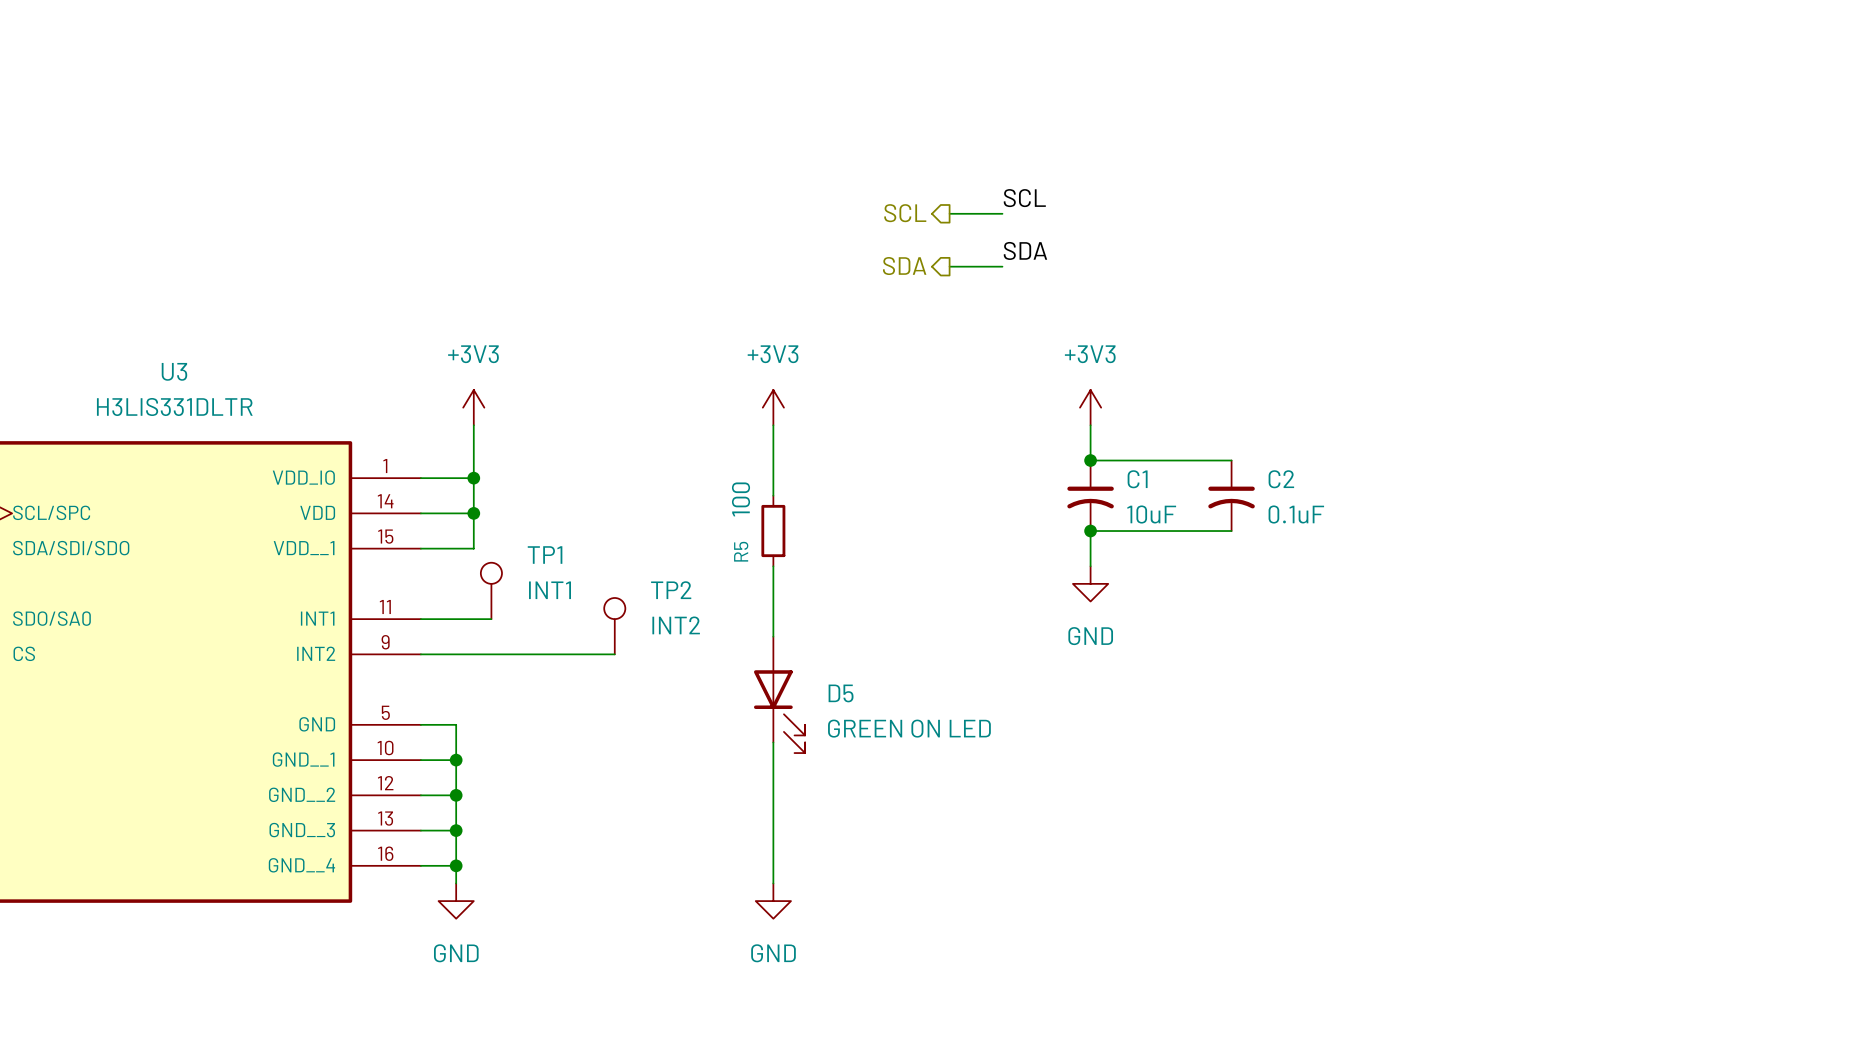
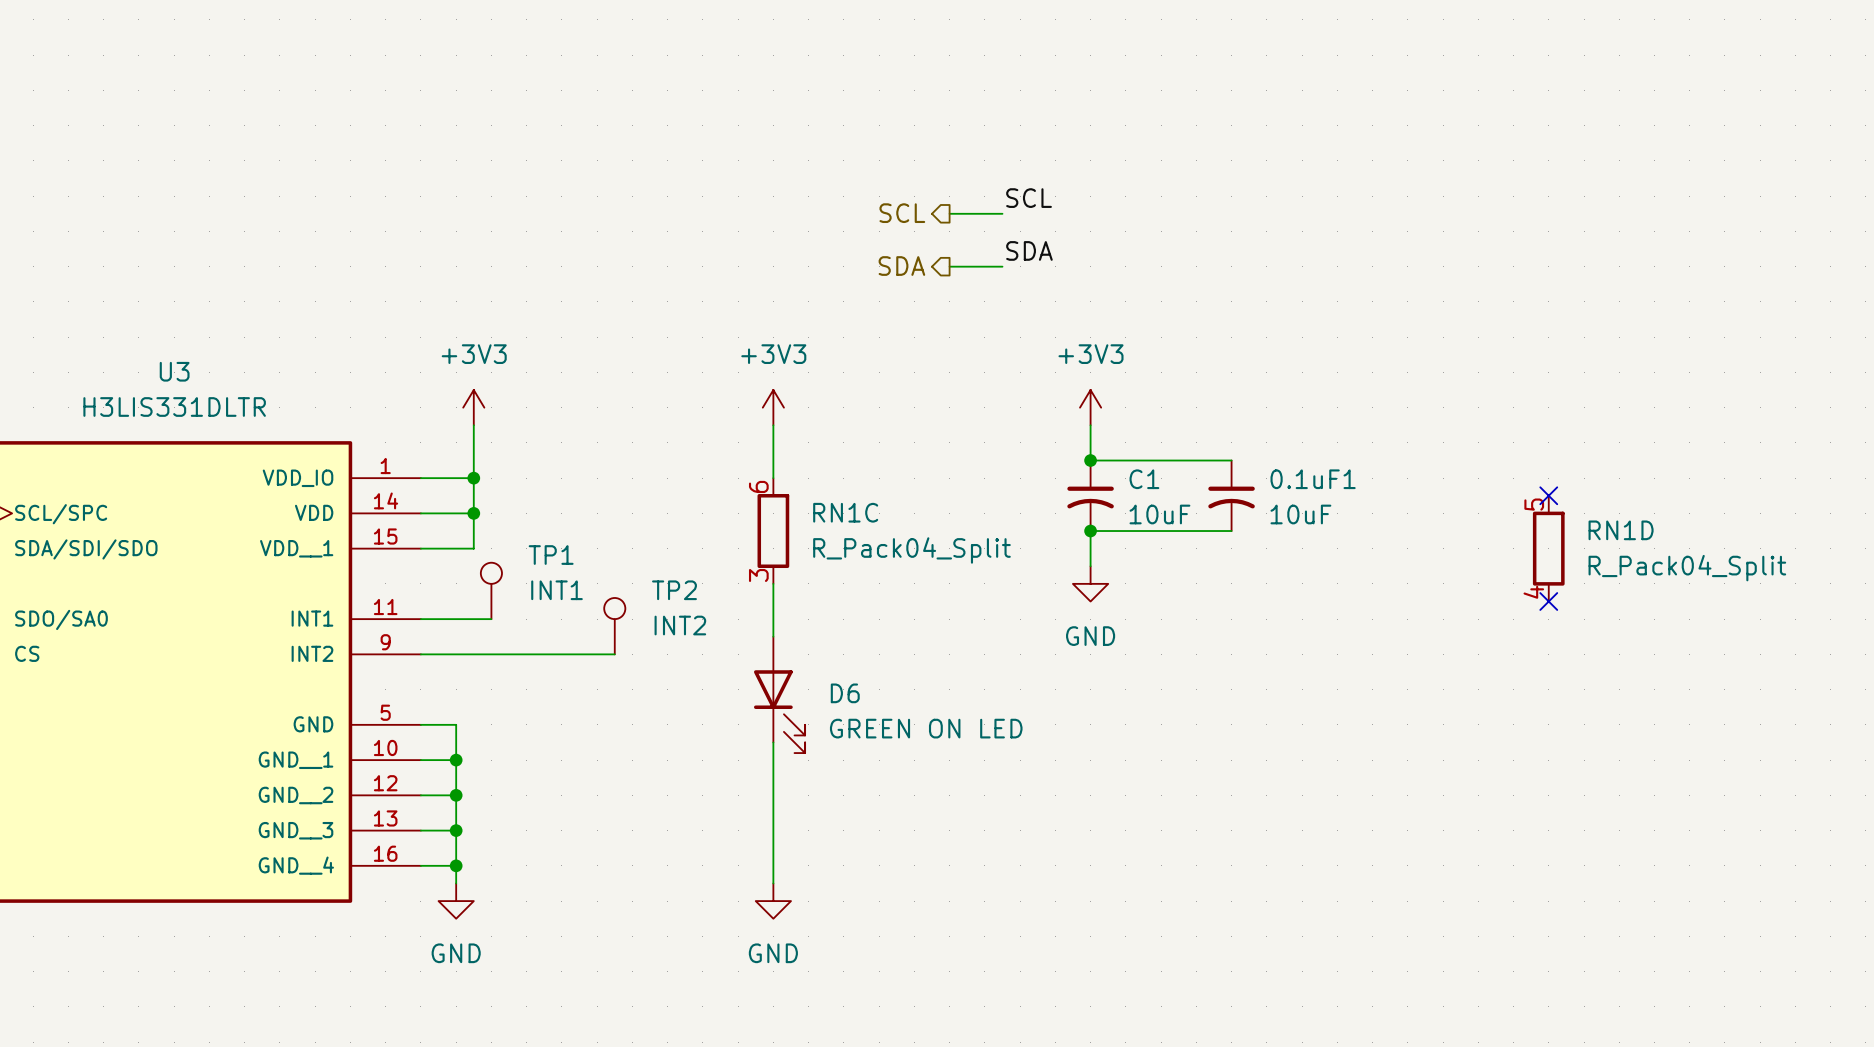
C2 name: C2 (1281, 479) -> 0.1uF1 (1313, 479)
no-connect mark: none -> (1548, 495)
C2 value: 0.1uF (1296, 514) -> 10uF (1300, 514)
R5: 100 (773, 531) -> none
RN1C: none -> R_Pack04_Split (773, 531)
RN1D: none -> R_Pack04_Split (1548, 548)
no-connect mark: none -> (1548, 601)
D5 name: D5 (841, 693) -> D6 (845, 693)

